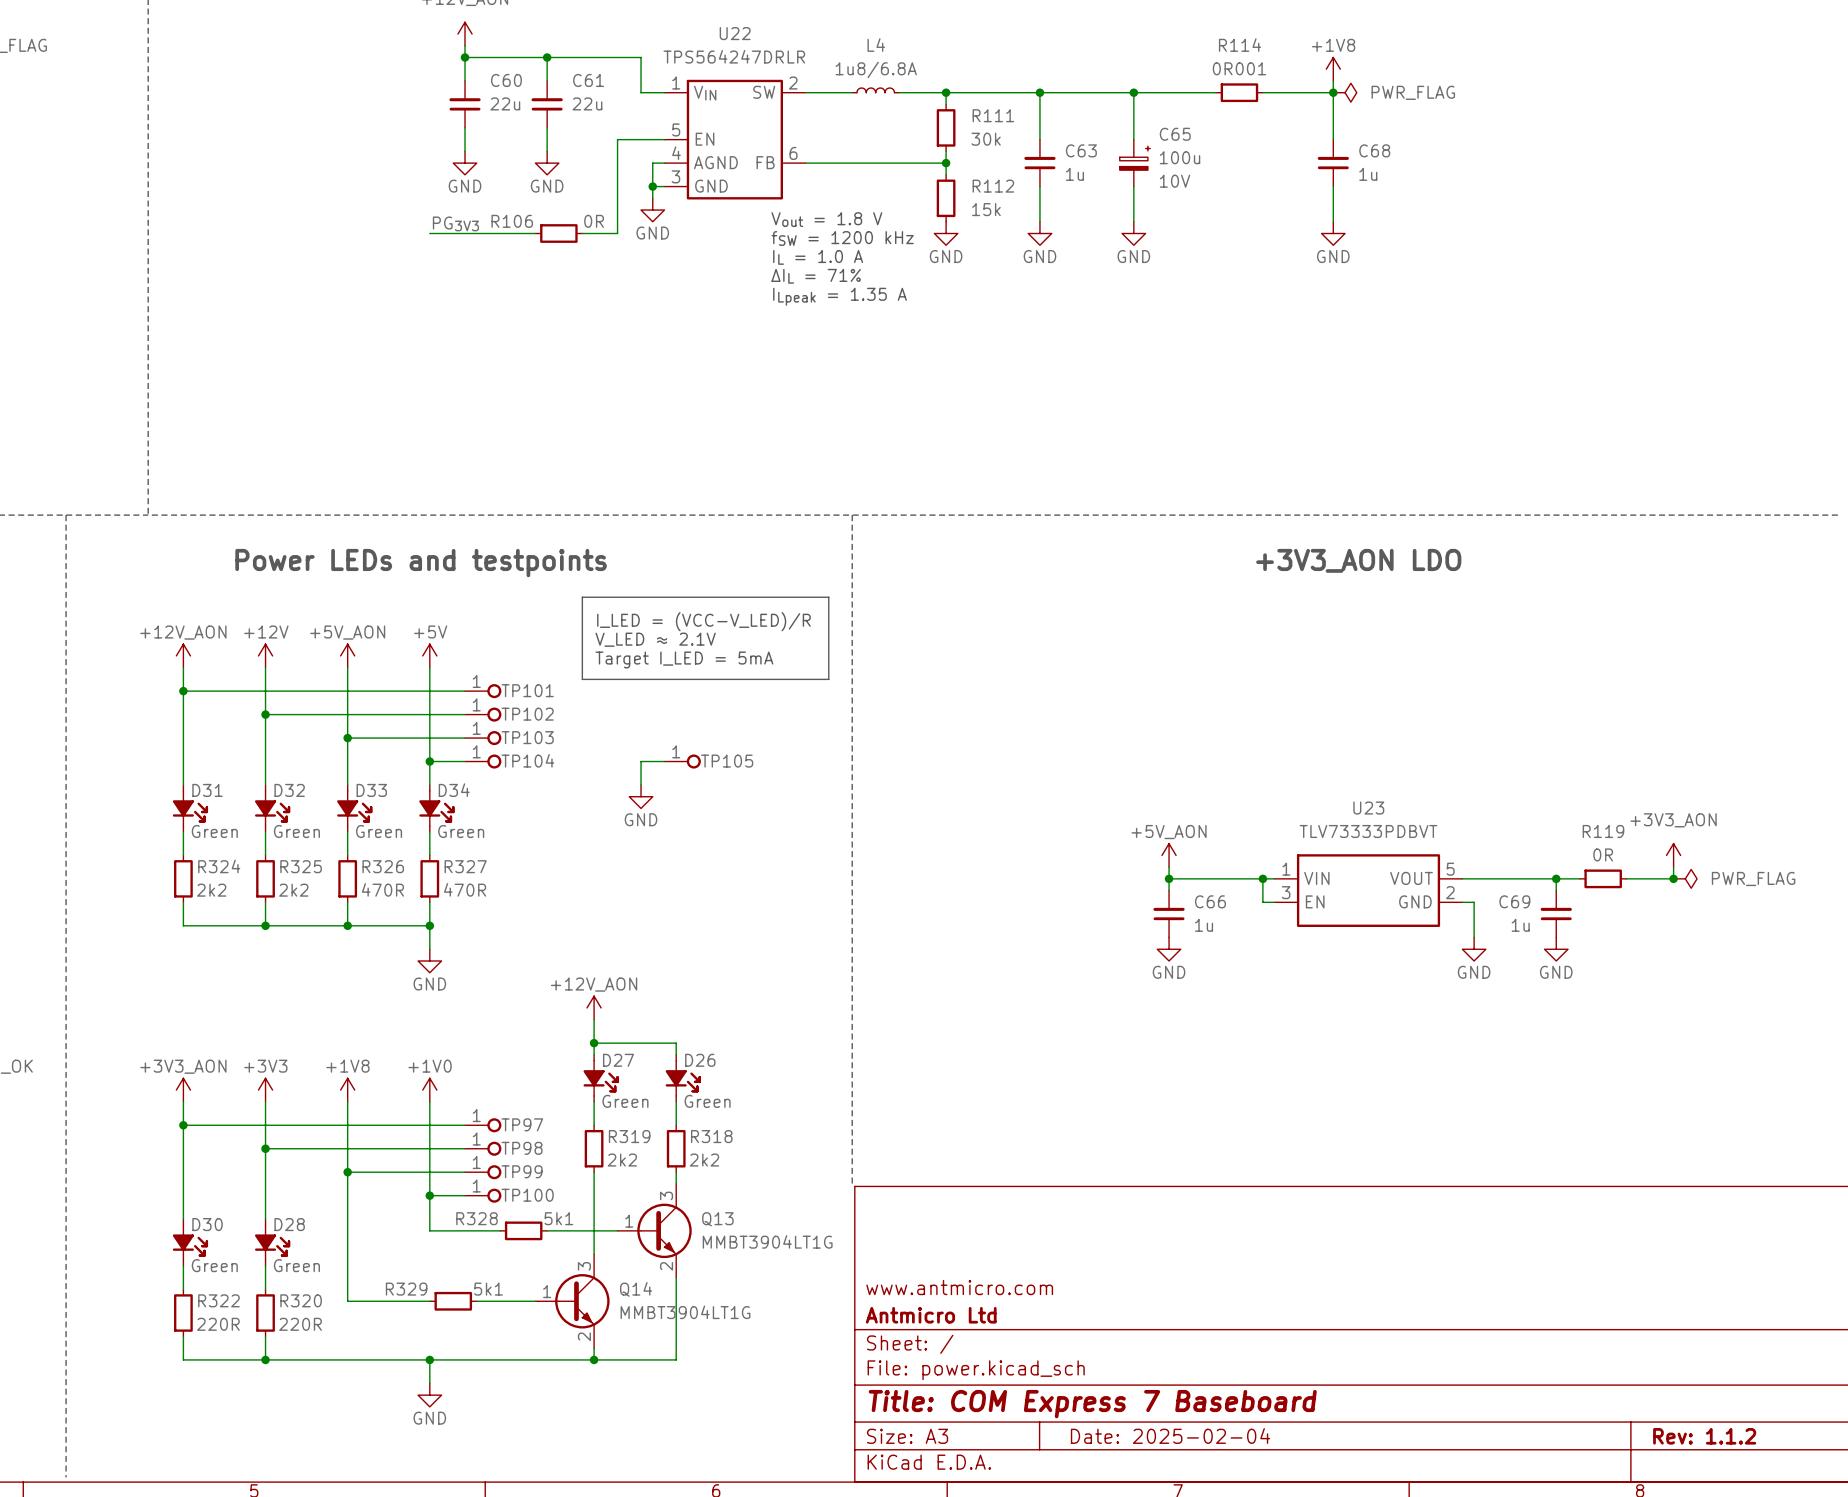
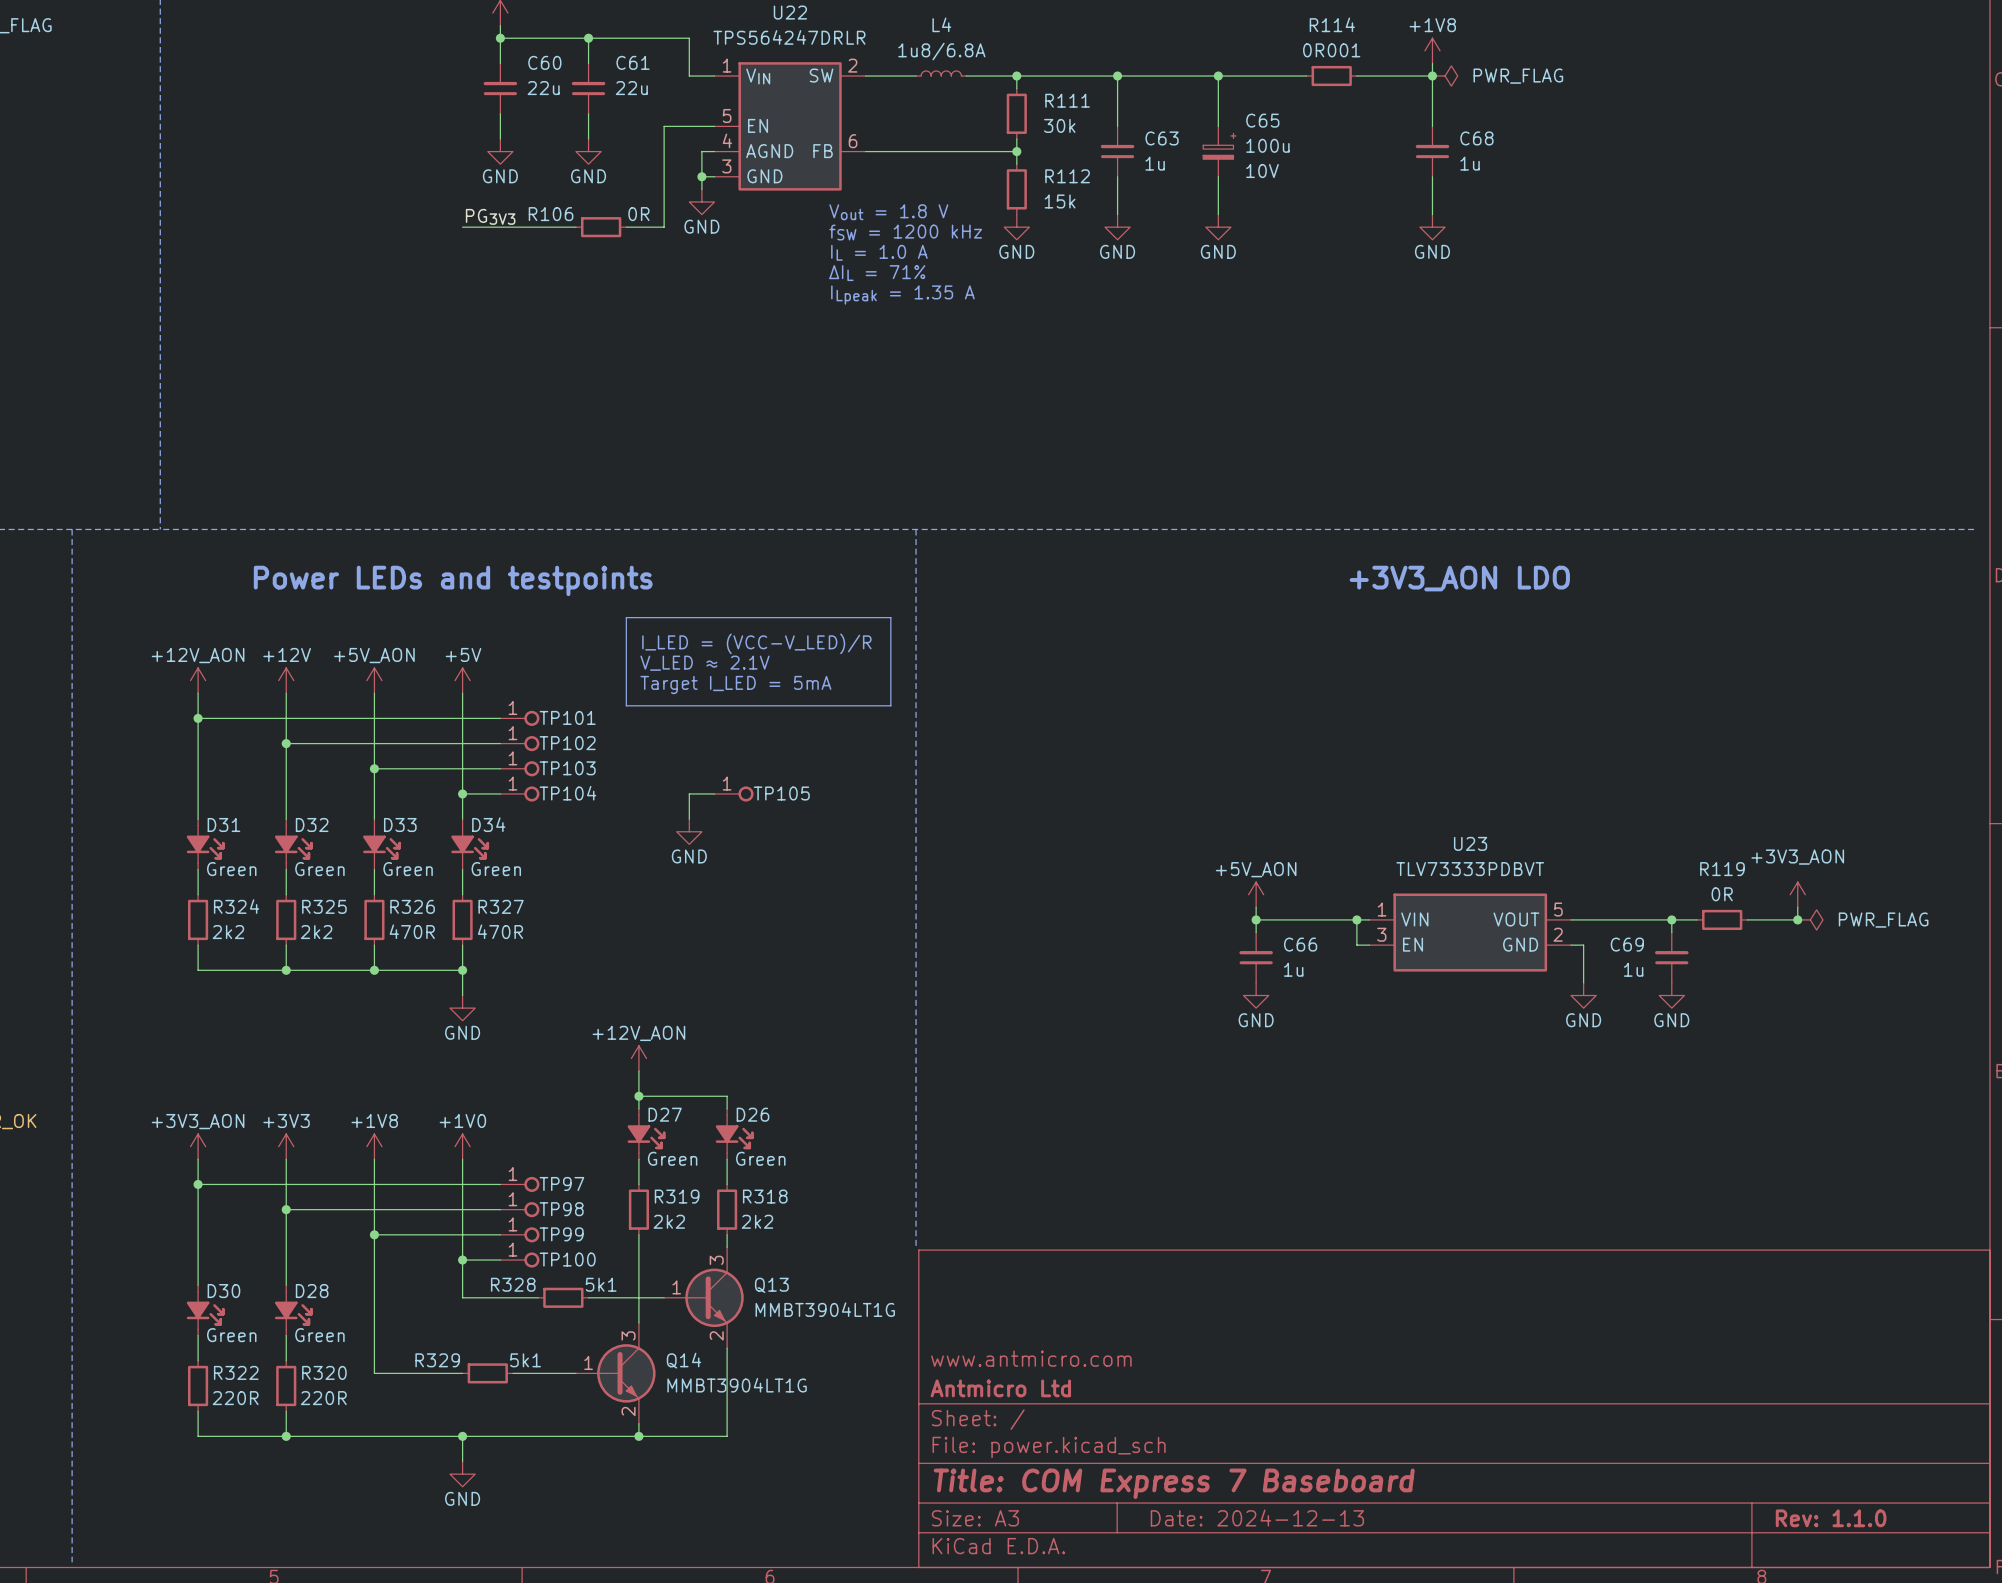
title block: Date: 2025-02-04 (1170, 1435) -> Date: 2024-12-13 (1257, 1517)
title block: Rev: 1.1.2 (1704, 1436) -> Rev: 1.1.0 (1831, 1518)

